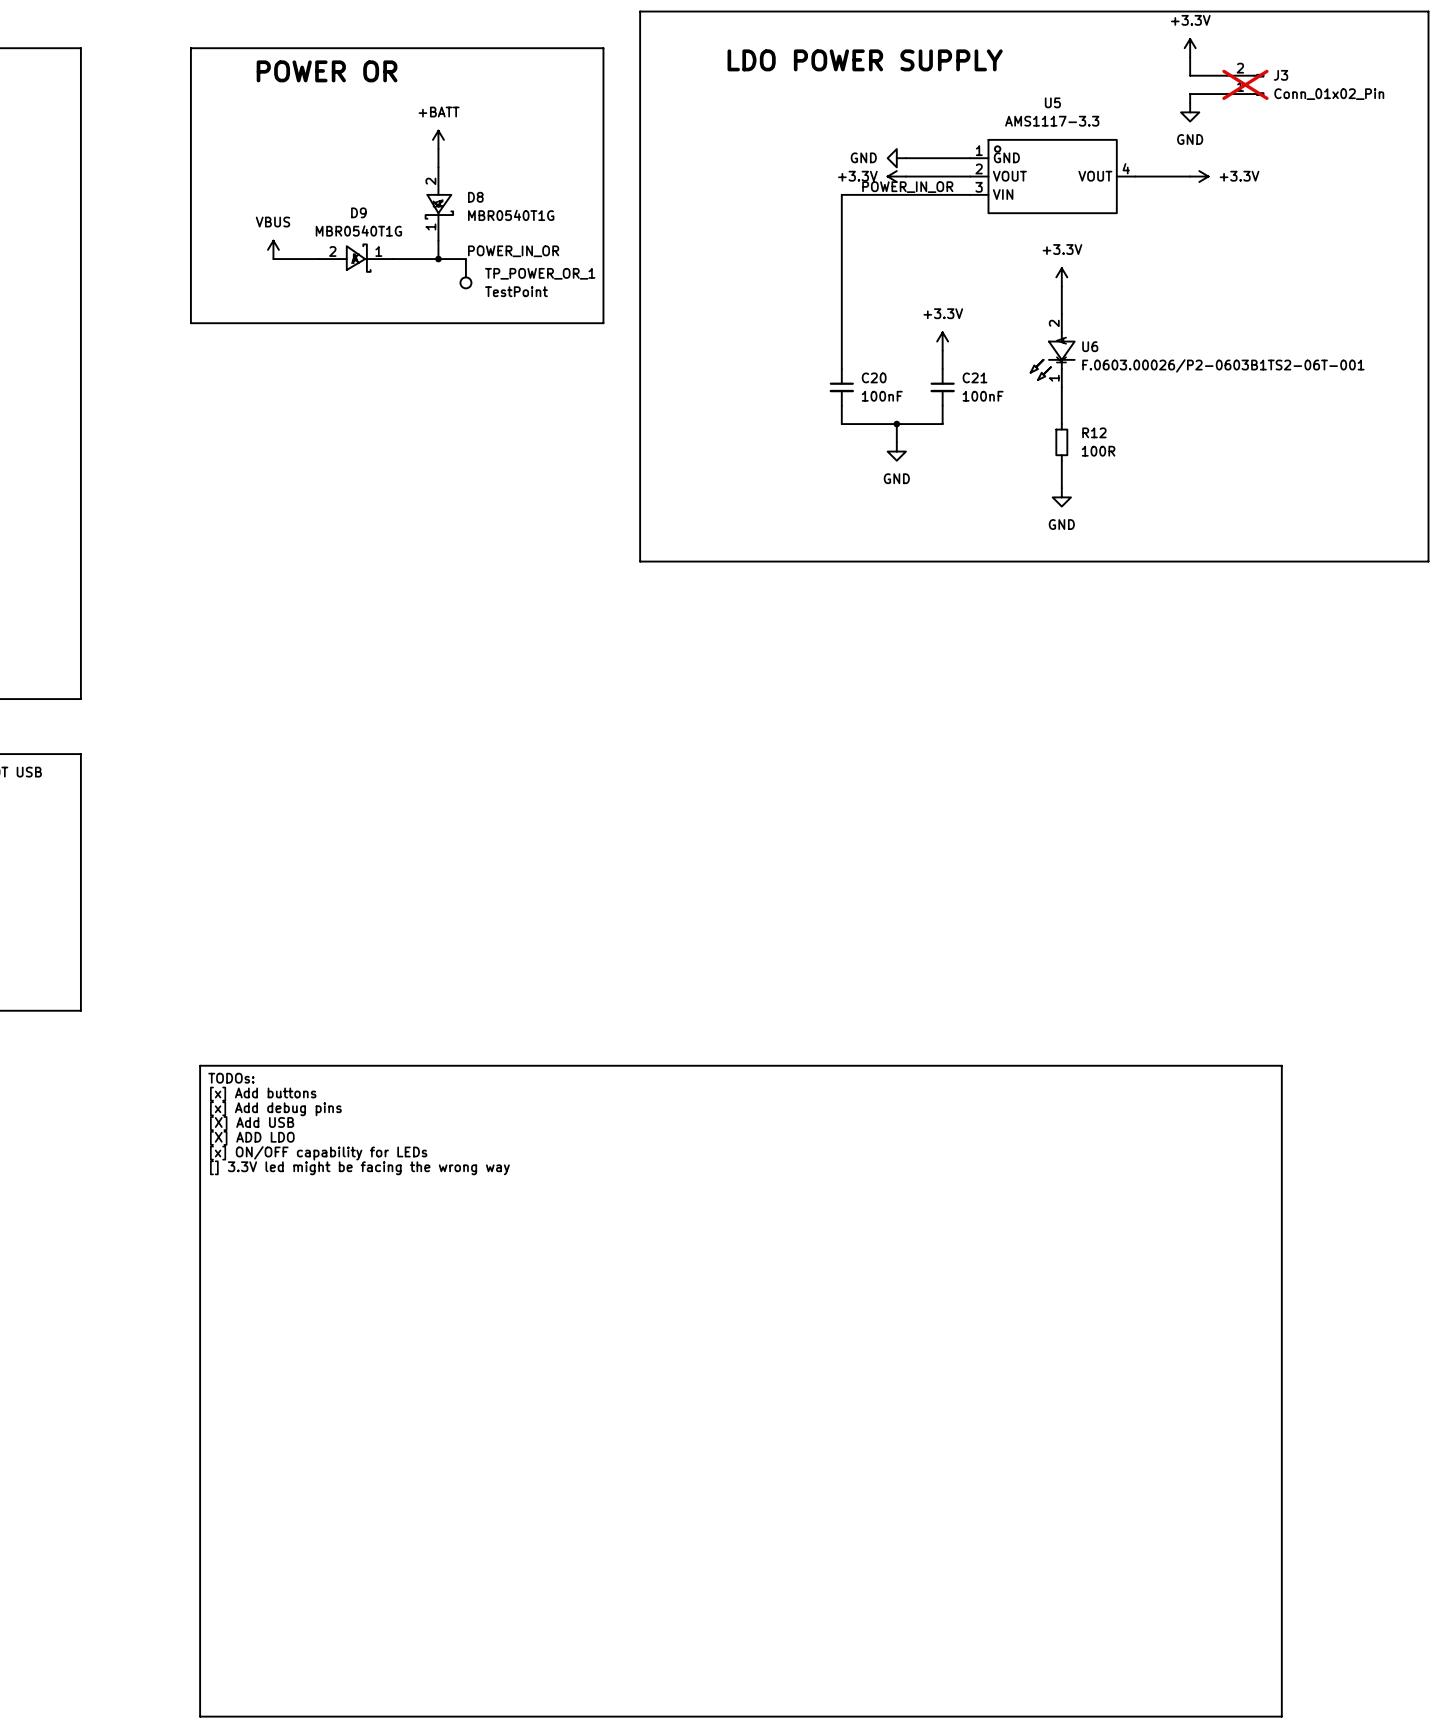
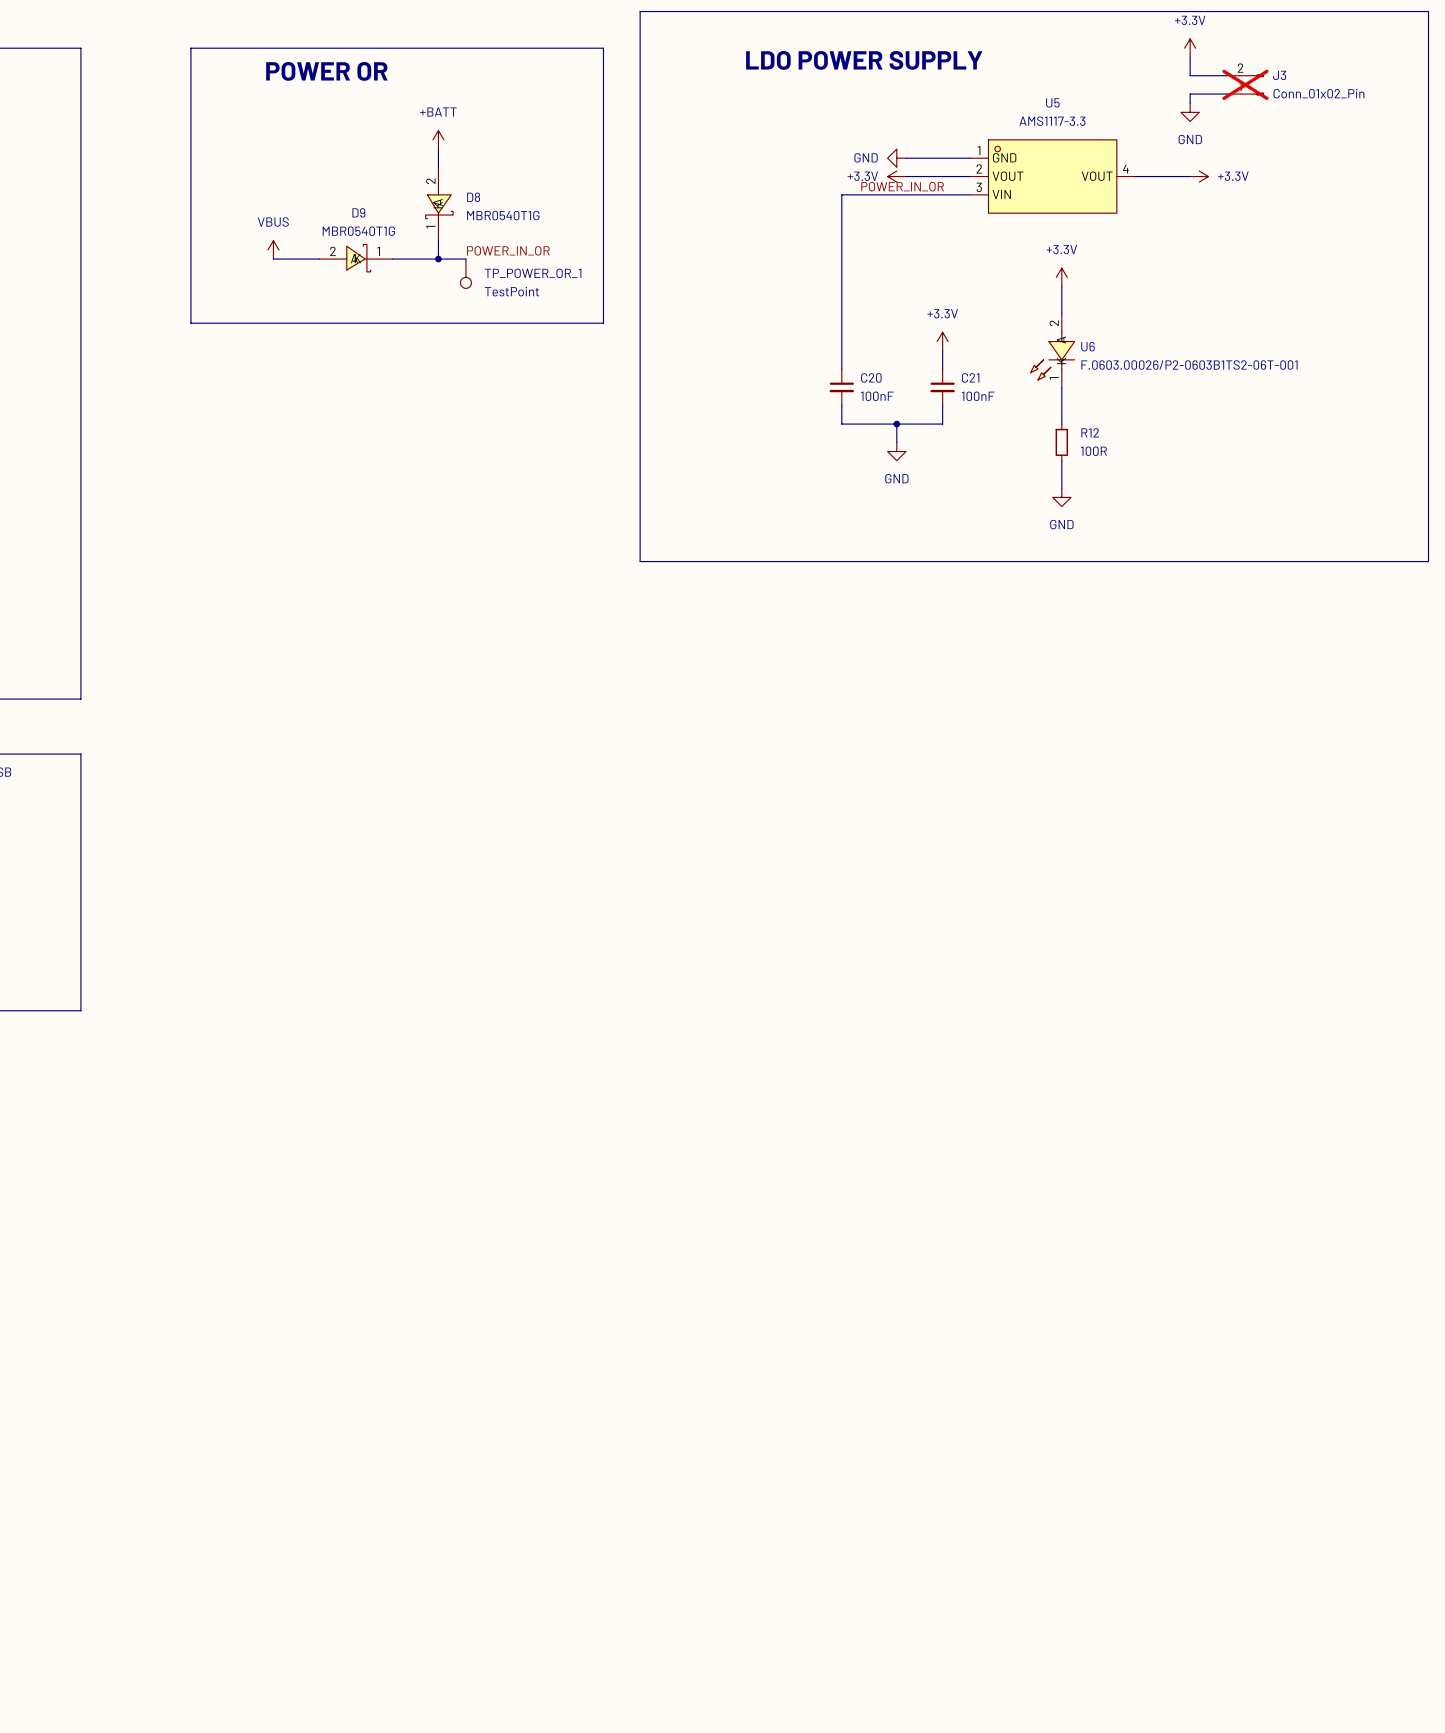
line: (200, 1065) (1281, 1065) (1281, 1716) (200, 1716) (200, 1065) -> none
text: TODOs: (231, 1078) -> none
text: [x] Add buttons (263, 1094) -> none
text: [x] Add debug pins (275, 1108) -> none
text: [X] Add USB (252, 1123) -> none
text: [X] ADD LDO (252, 1138) -> none
text: [x] ON/OFF capability for LEDs (318, 1153) -> none
text: [] 3.3V led might be facing the wrong way (359, 1167) -> none

